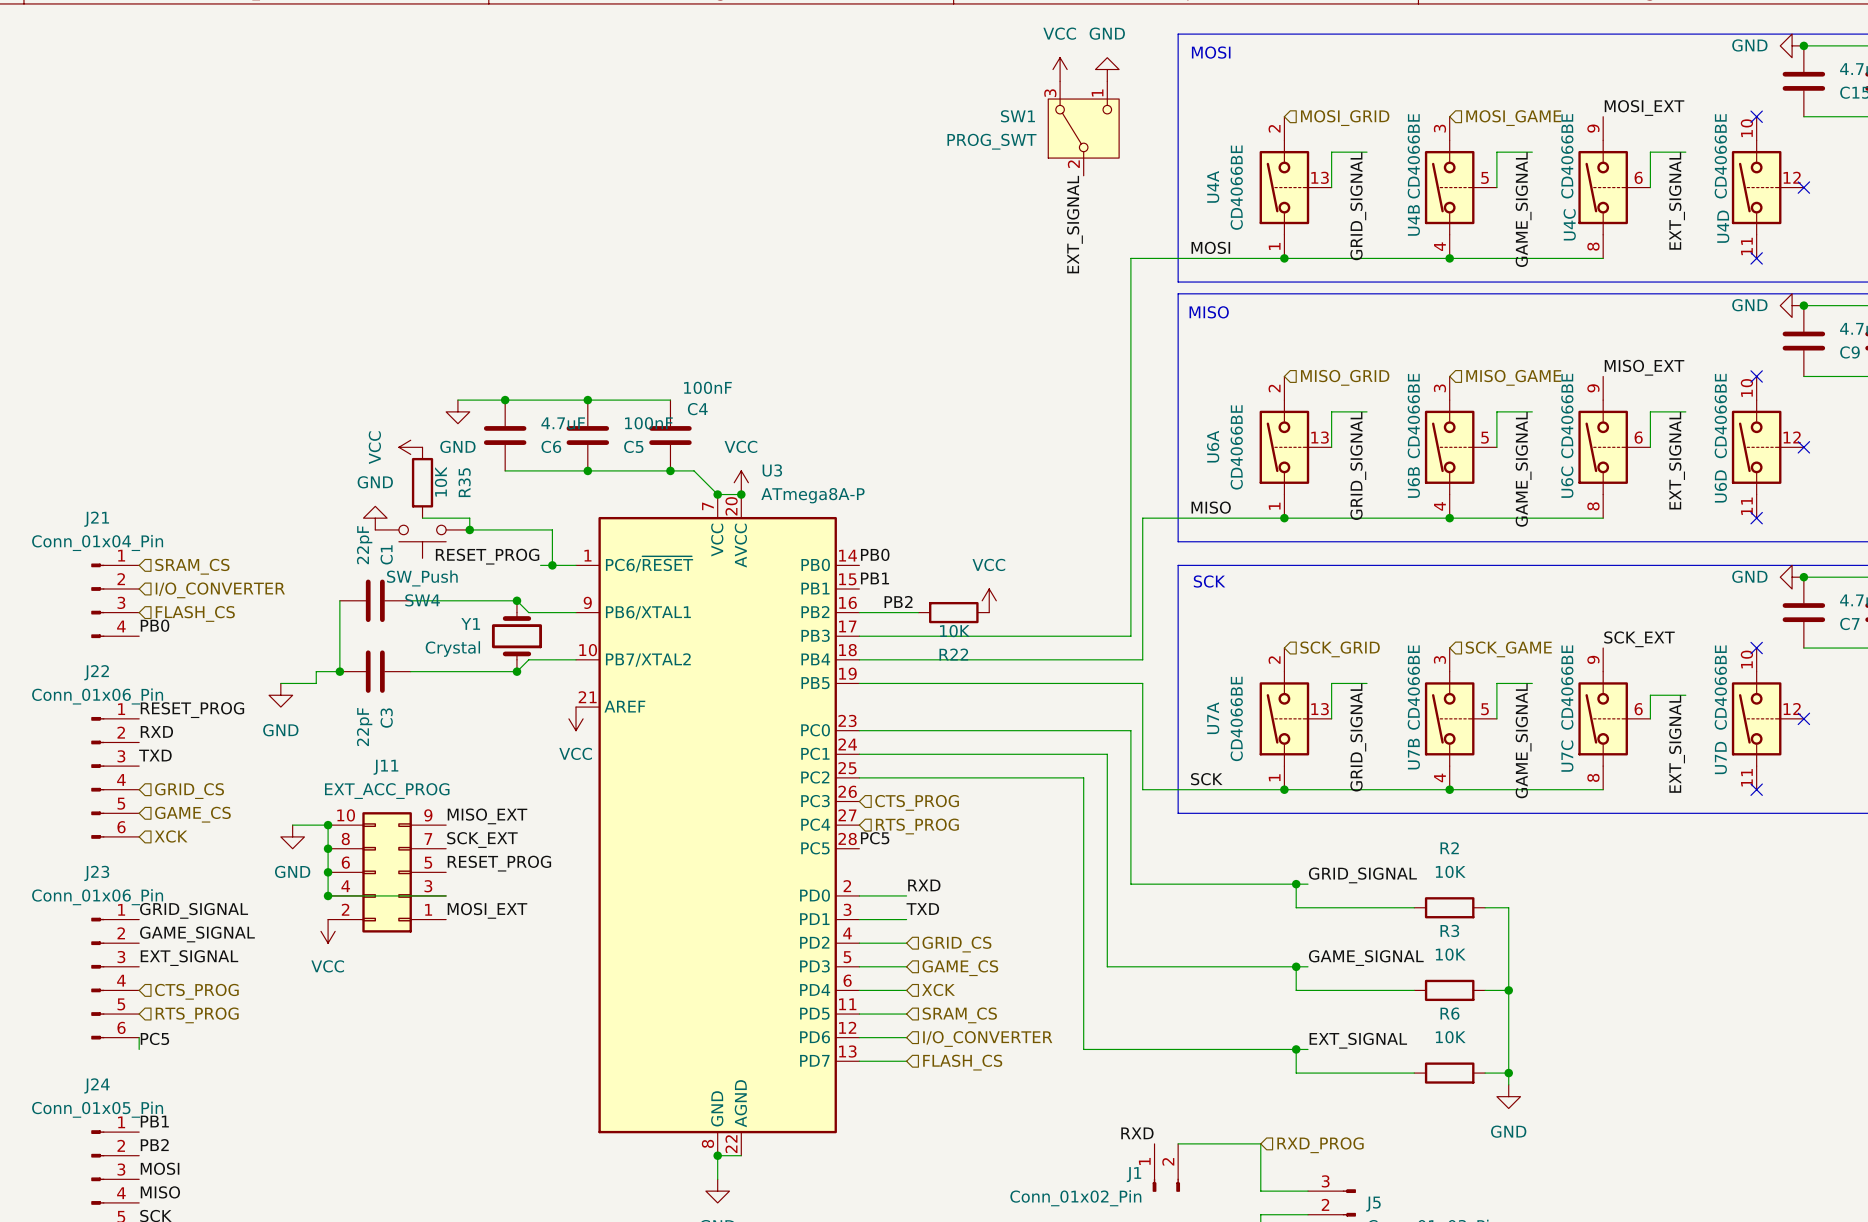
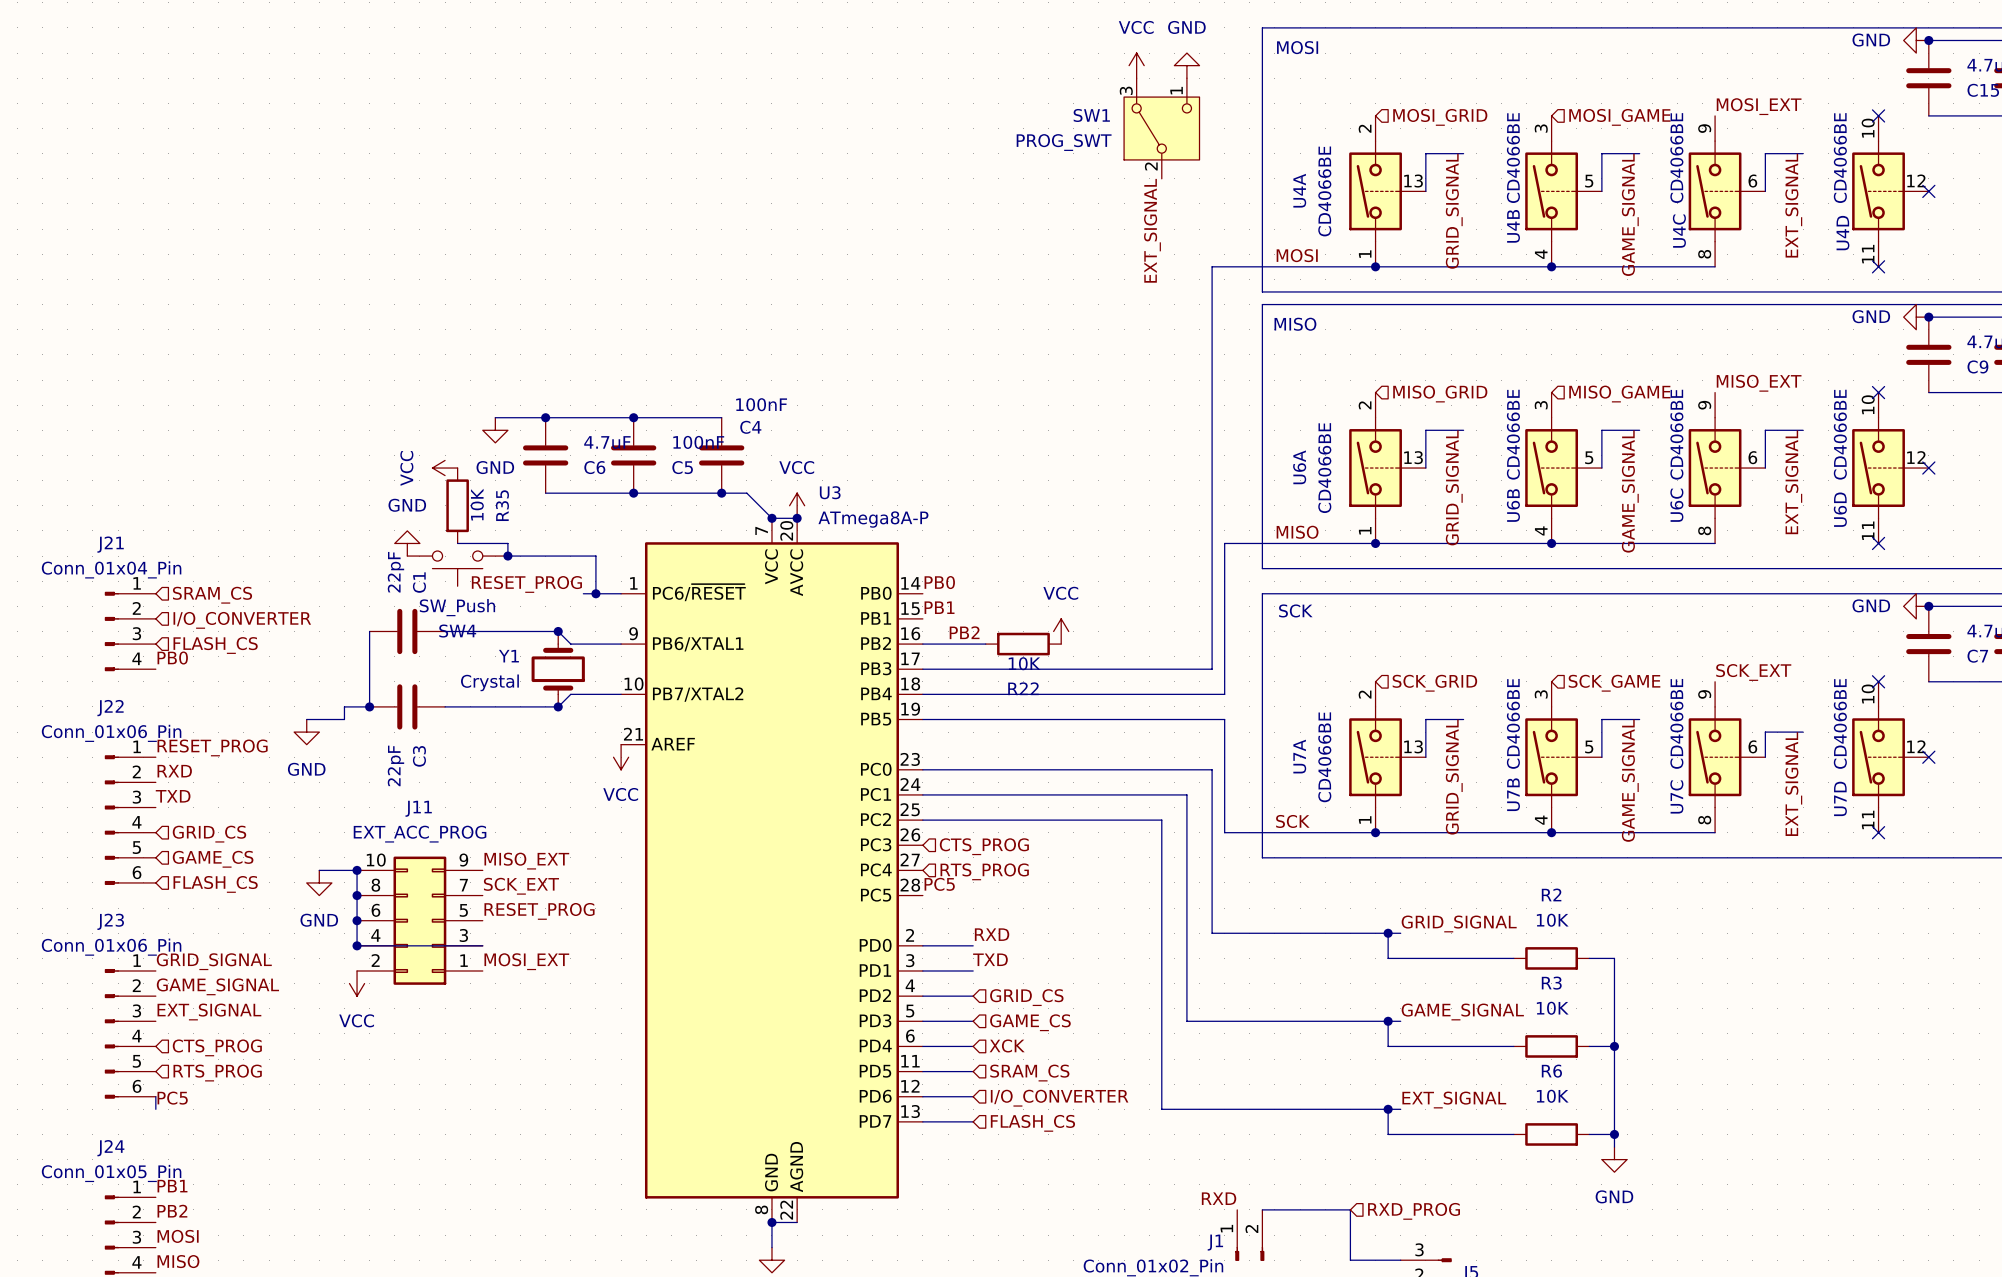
hierarchical label: XCK (171, 836) -> FLASH_CS (215, 884)

